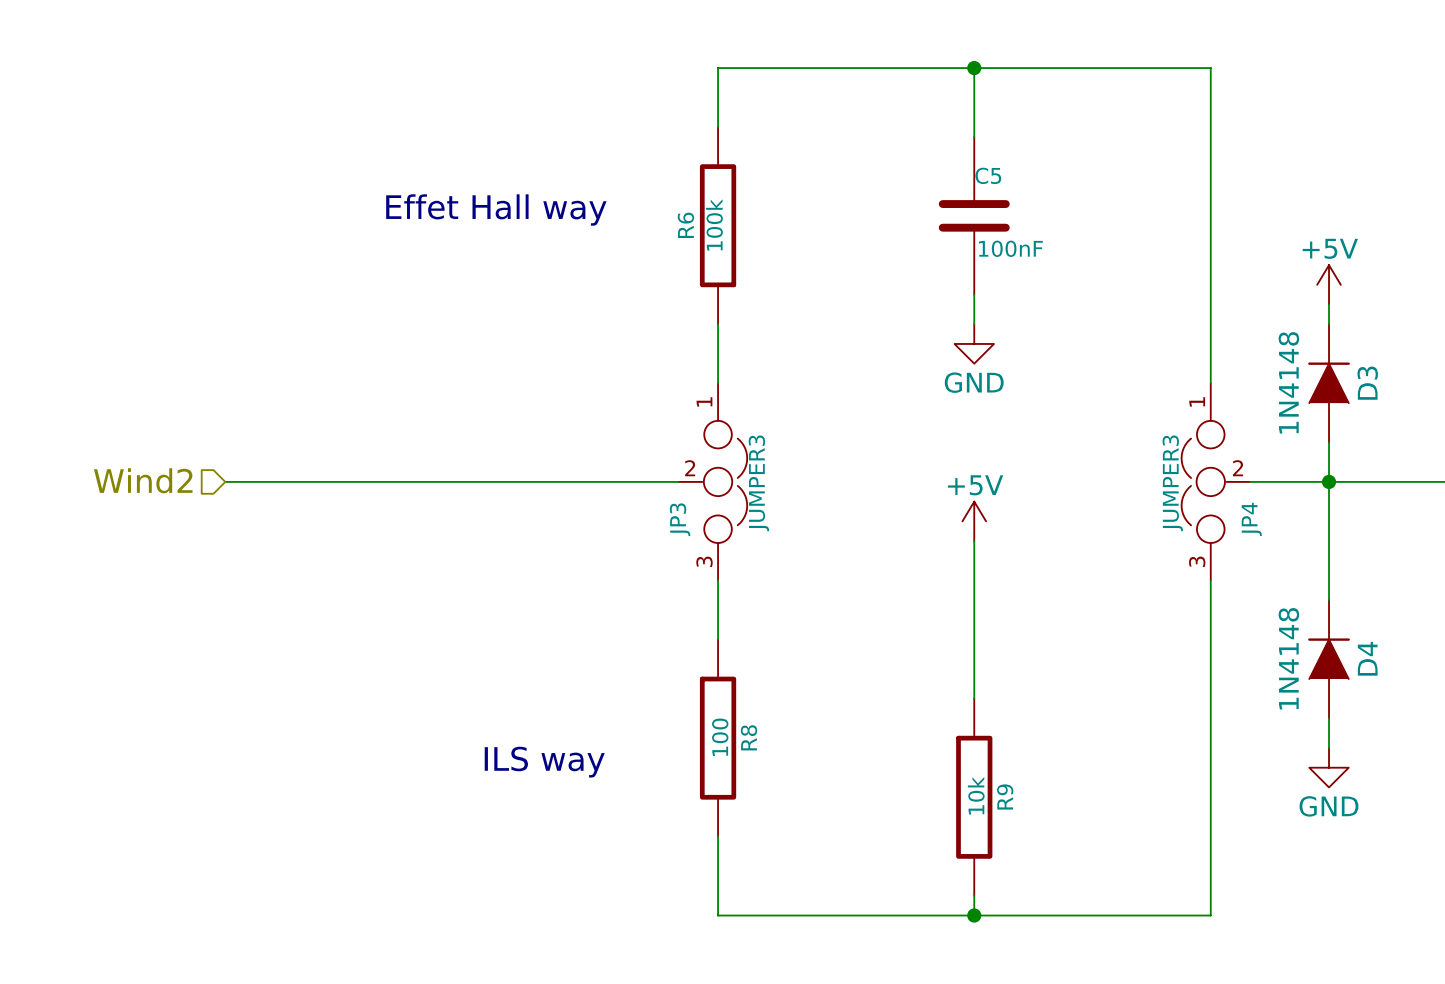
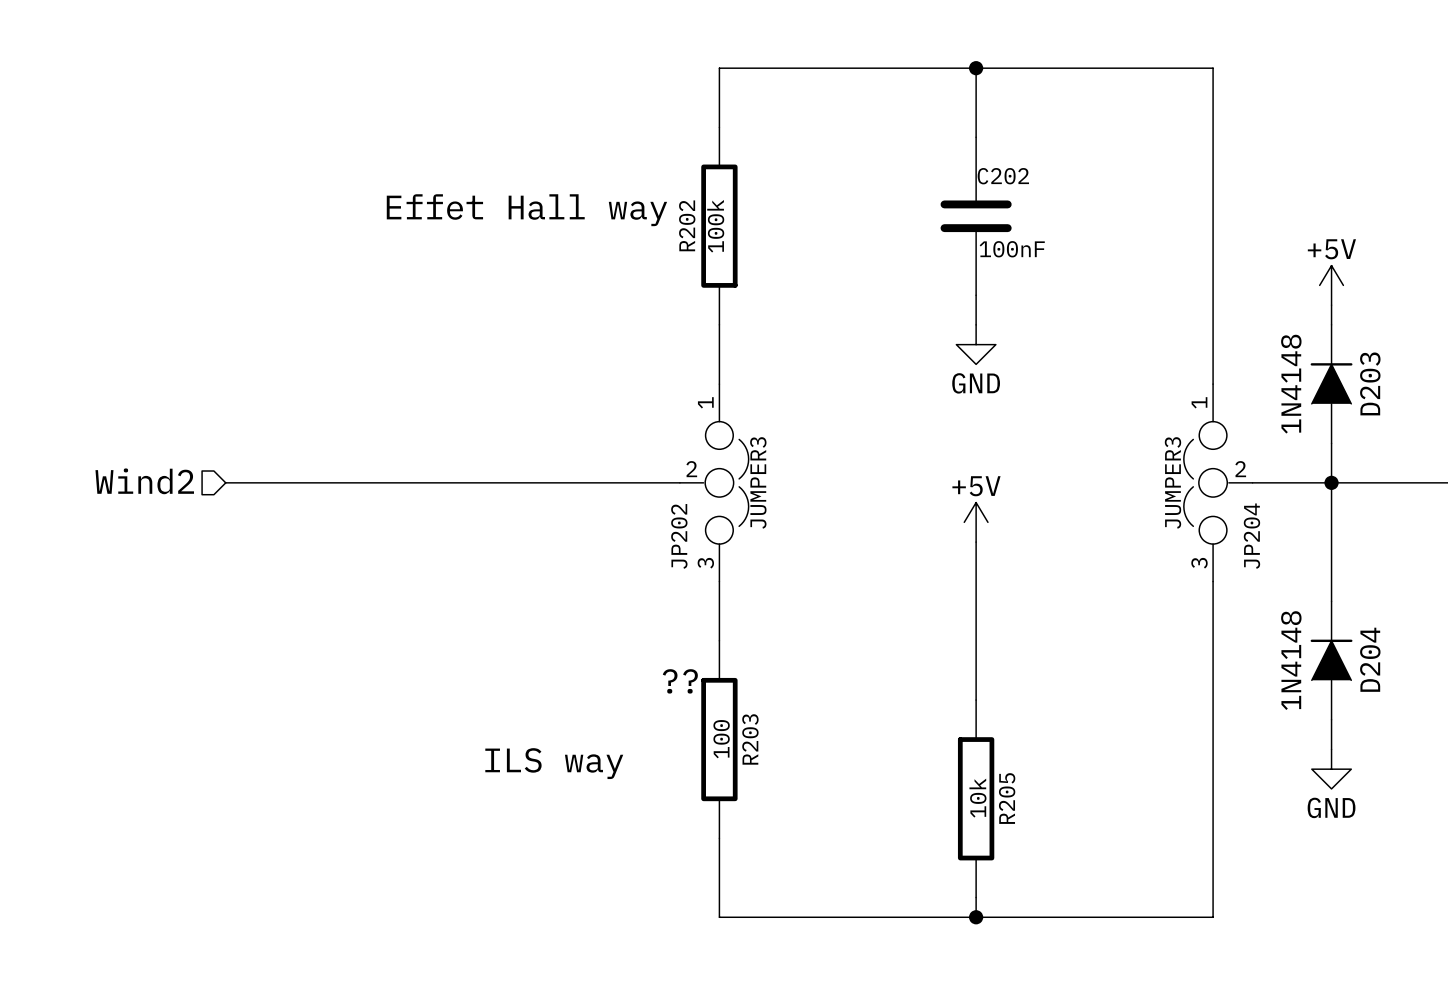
C5 name: C5 (988, 175) -> C202 (1003, 176)
R6 name: R6 (685, 225) -> R202 (687, 225)
D3 name: D3 (1367, 383) -> D203 (1370, 383)
JP3 name: JP3 (680, 519) -> JP202 (679, 536)
JP4 name: JP4 (1251, 519) -> JP204 (1251, 536)
D4 name: D4 (1367, 658) -> D204 (1370, 659)
text: none -> ?? (680, 681)
R8 name: R8 (749, 737) -> R203 (750, 739)
R9 name: R9 (1005, 796) -> R205 (1007, 798)

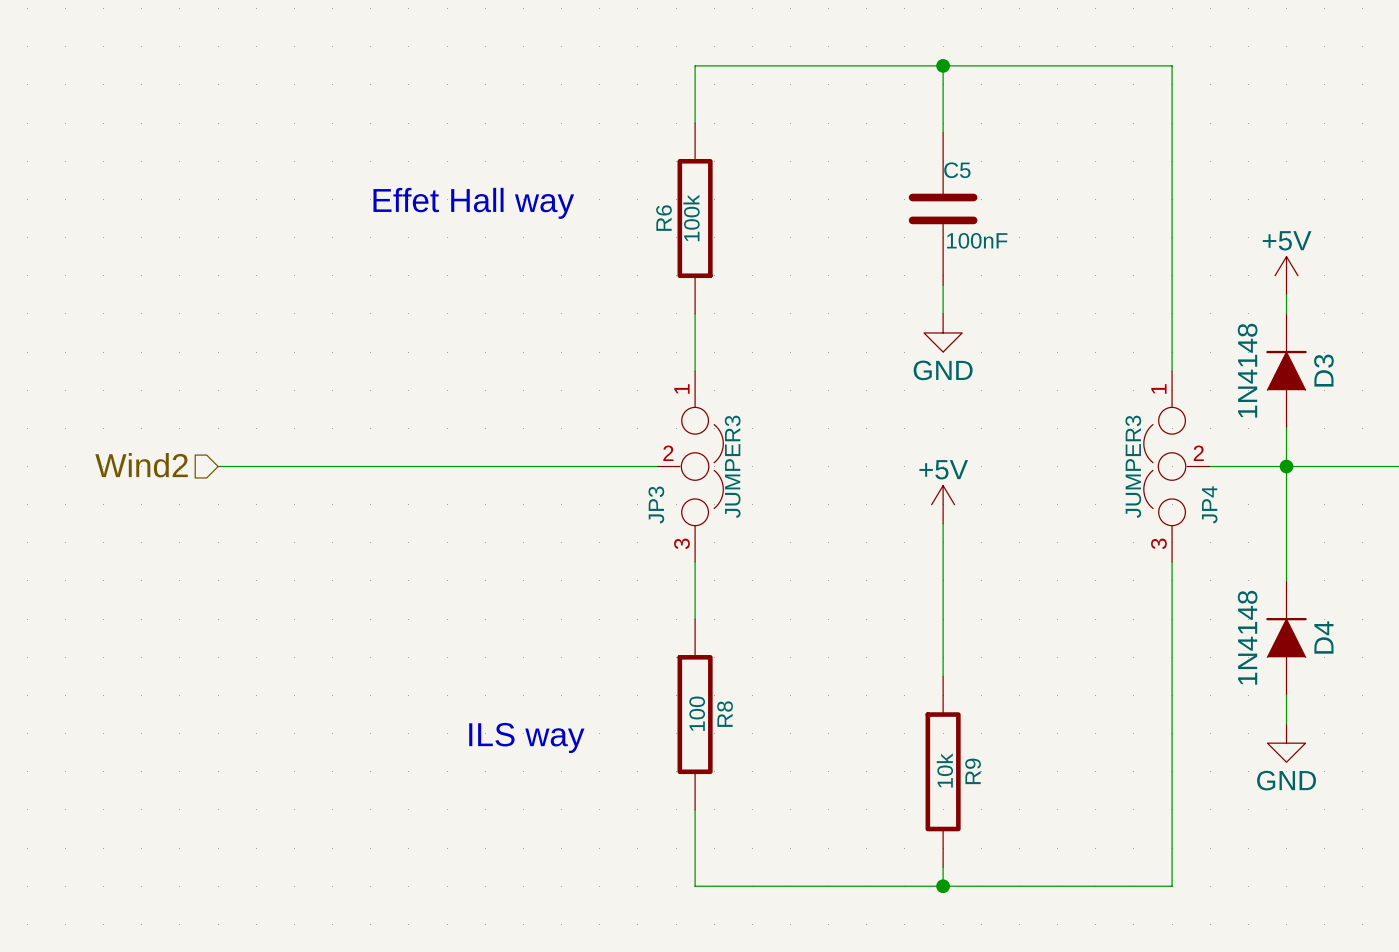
C202 name: C202 (1003, 176) -> C5 (957, 170)
R202 name: R202 (687, 225) -> R6 (663, 218)
D203 name: D203 (1370, 383) -> D3 (1323, 370)
JP202 name: JP202 (679, 536) -> JP3 (656, 505)
JP204 name: JP204 (1251, 536) -> JP4 (1209, 504)
D204 name: D204 (1370, 659) -> D4 (1323, 637)
text: ?? (680, 681) -> none
R203 name: R203 (750, 739) -> R8 (725, 714)
R205 name: R205 (1007, 798) -> R9 (973, 771)

